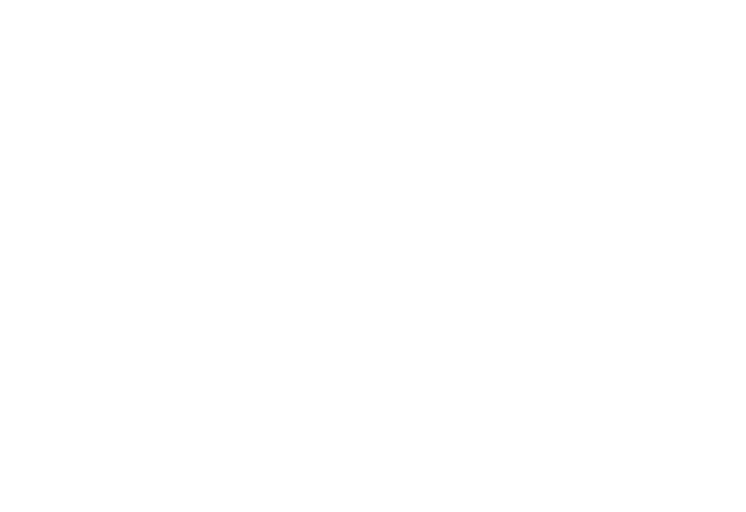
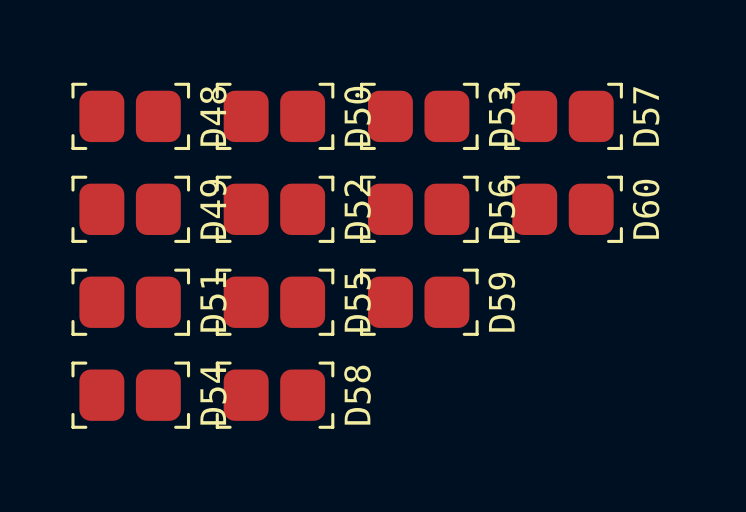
D48: none -> (130, 116)
D50: none -> (275, 116)
D53: none -> (419, 116)
D57: none -> (563, 116)
D49: none -> (130, 209)
D52: none -> (275, 209)
D56: none -> (419, 209)
D60: none -> (563, 209)
D51: none -> (130, 302)
D55: none -> (275, 302)
D59: none -> (419, 302)
D54: none -> (130, 395)
D58: none -> (275, 395)

